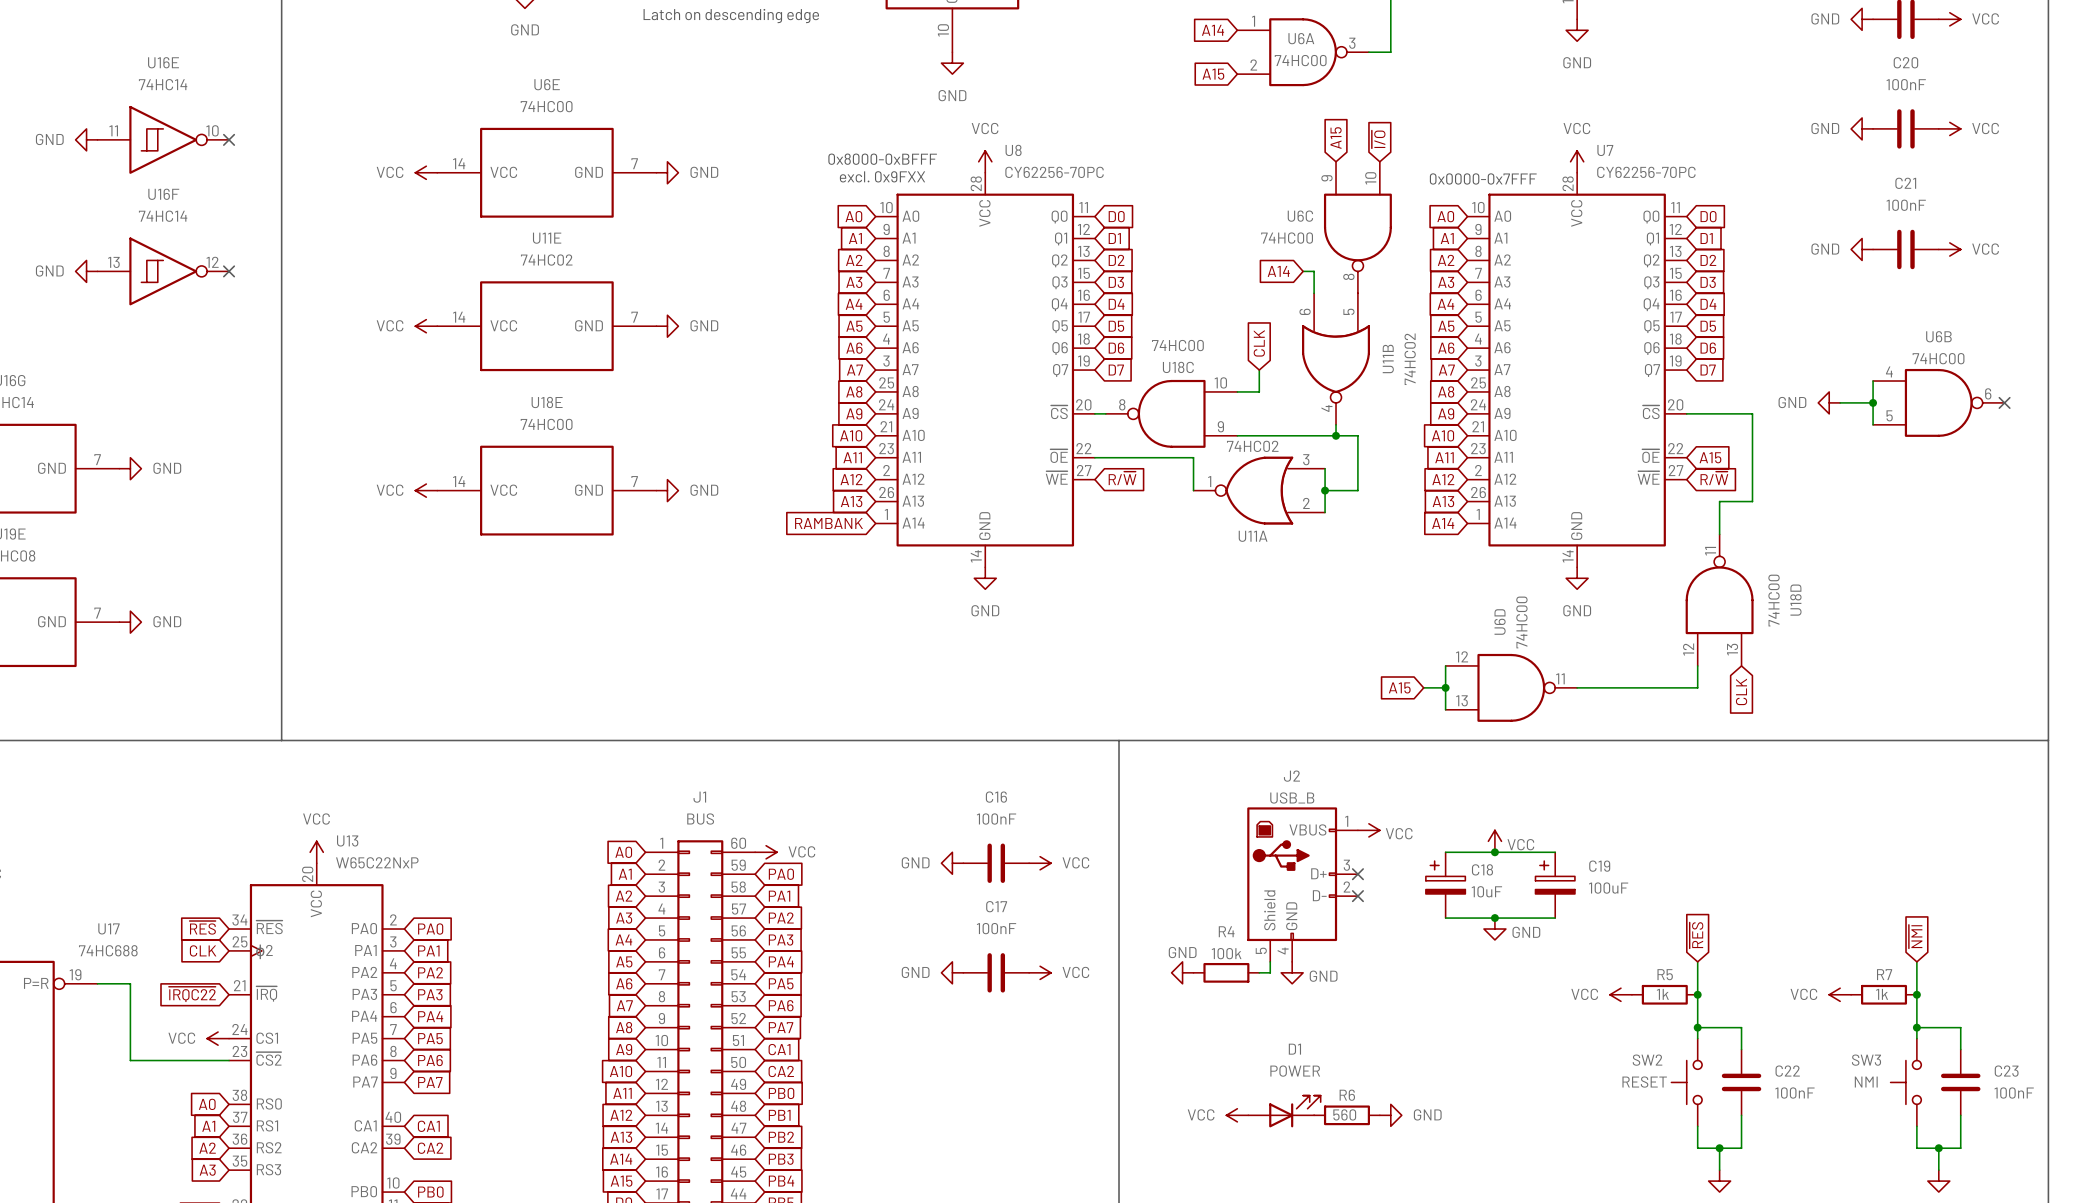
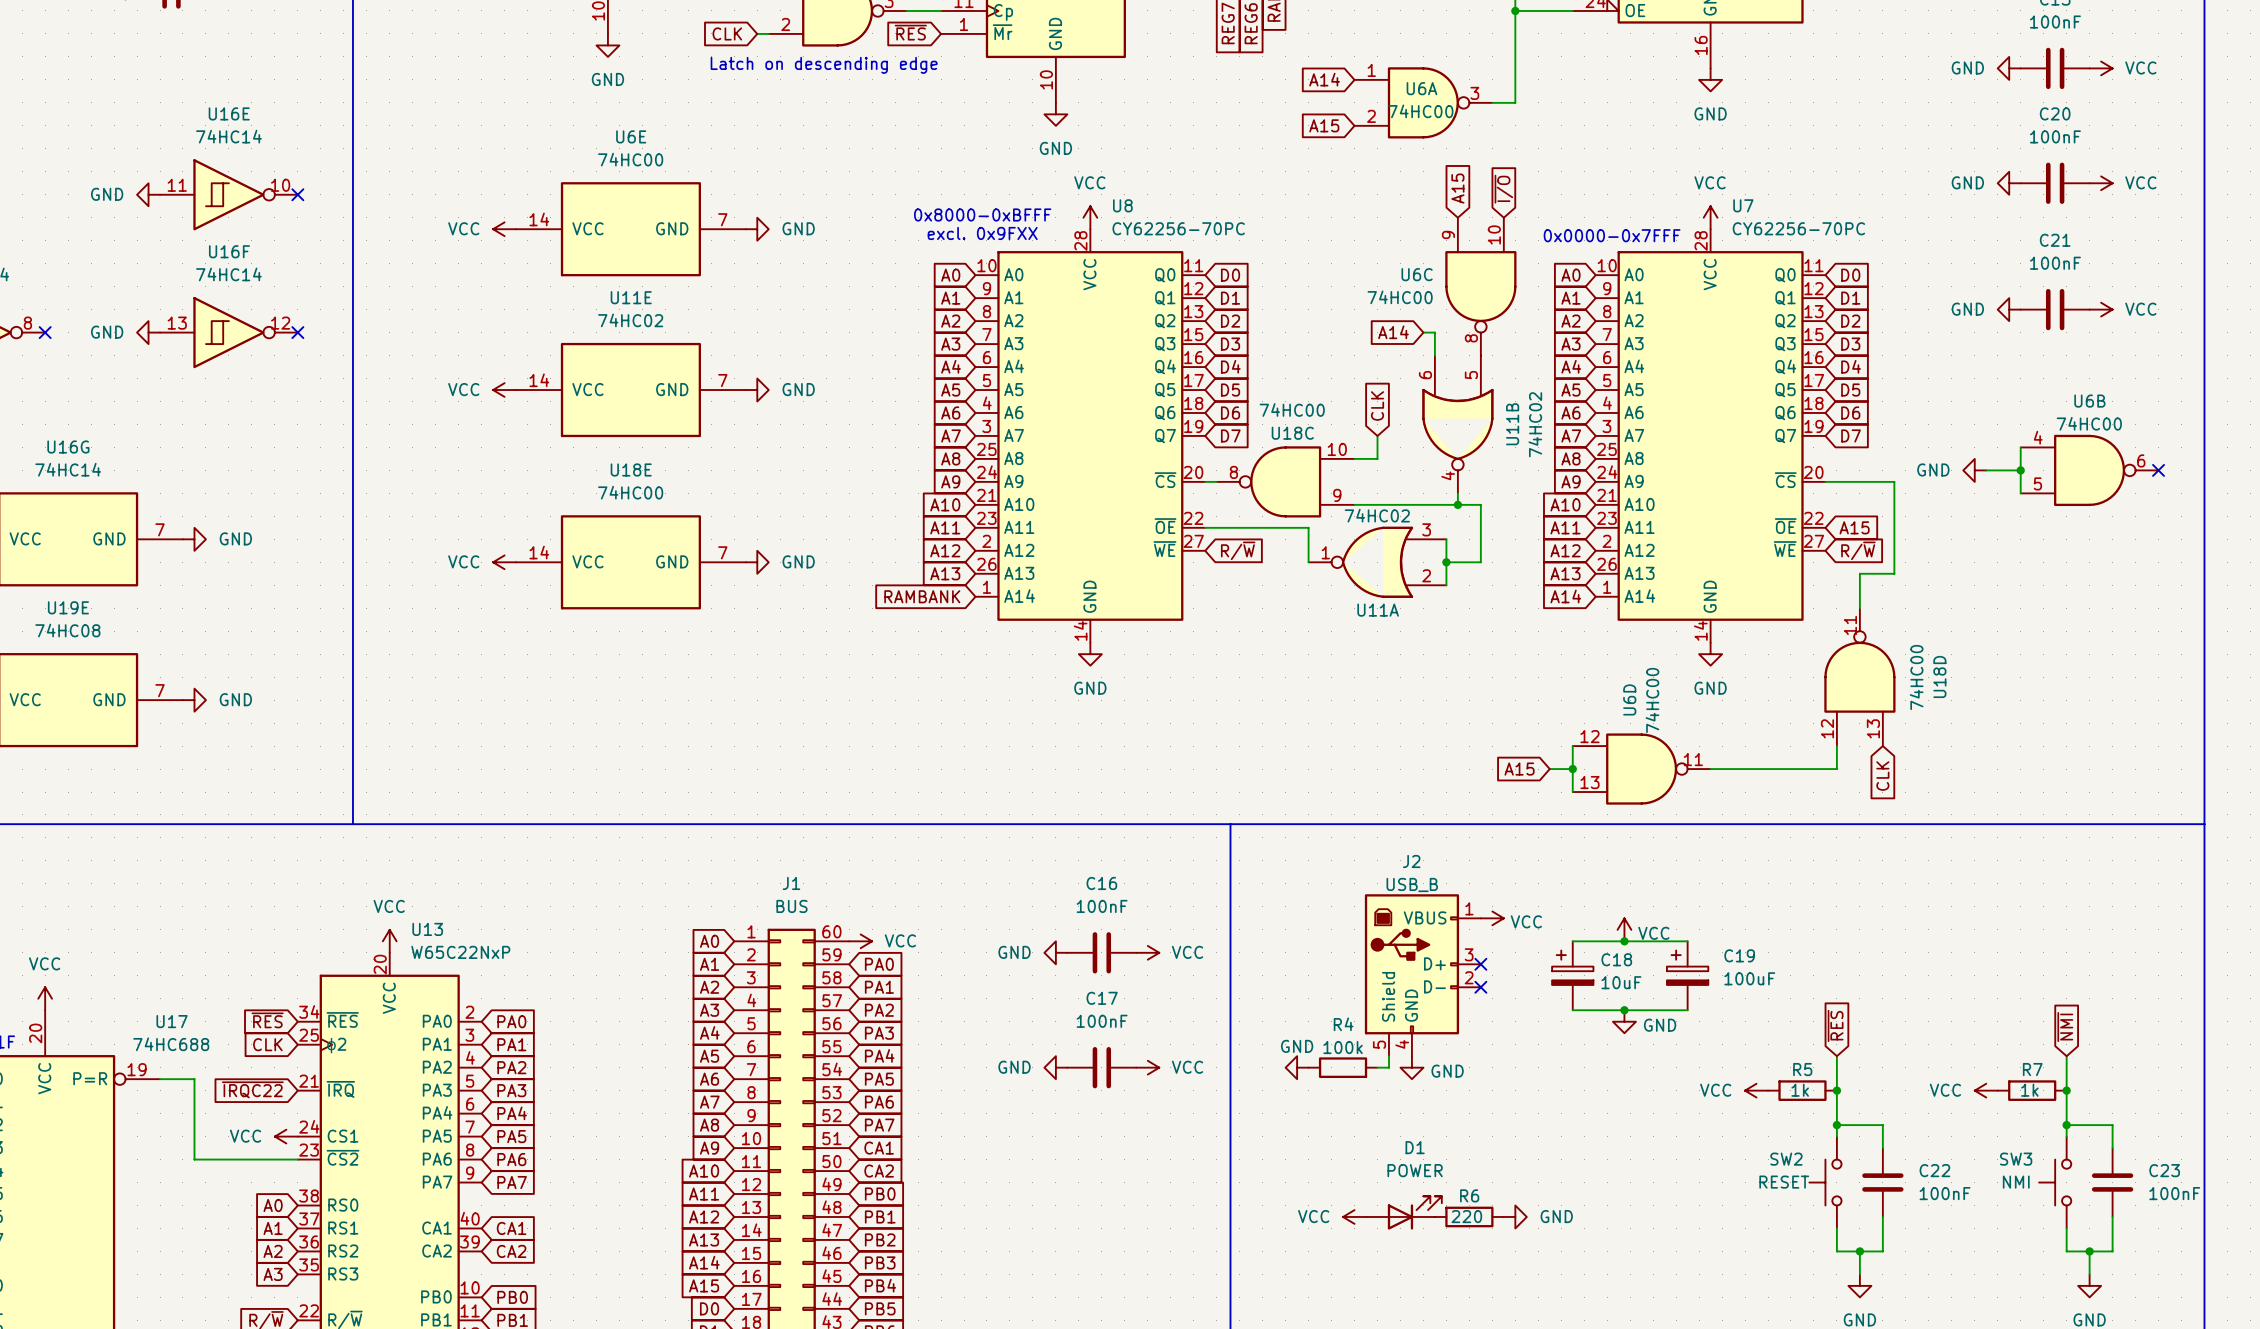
R6 value: 560 (1344, 1114) -> 220 (1466, 1216)

